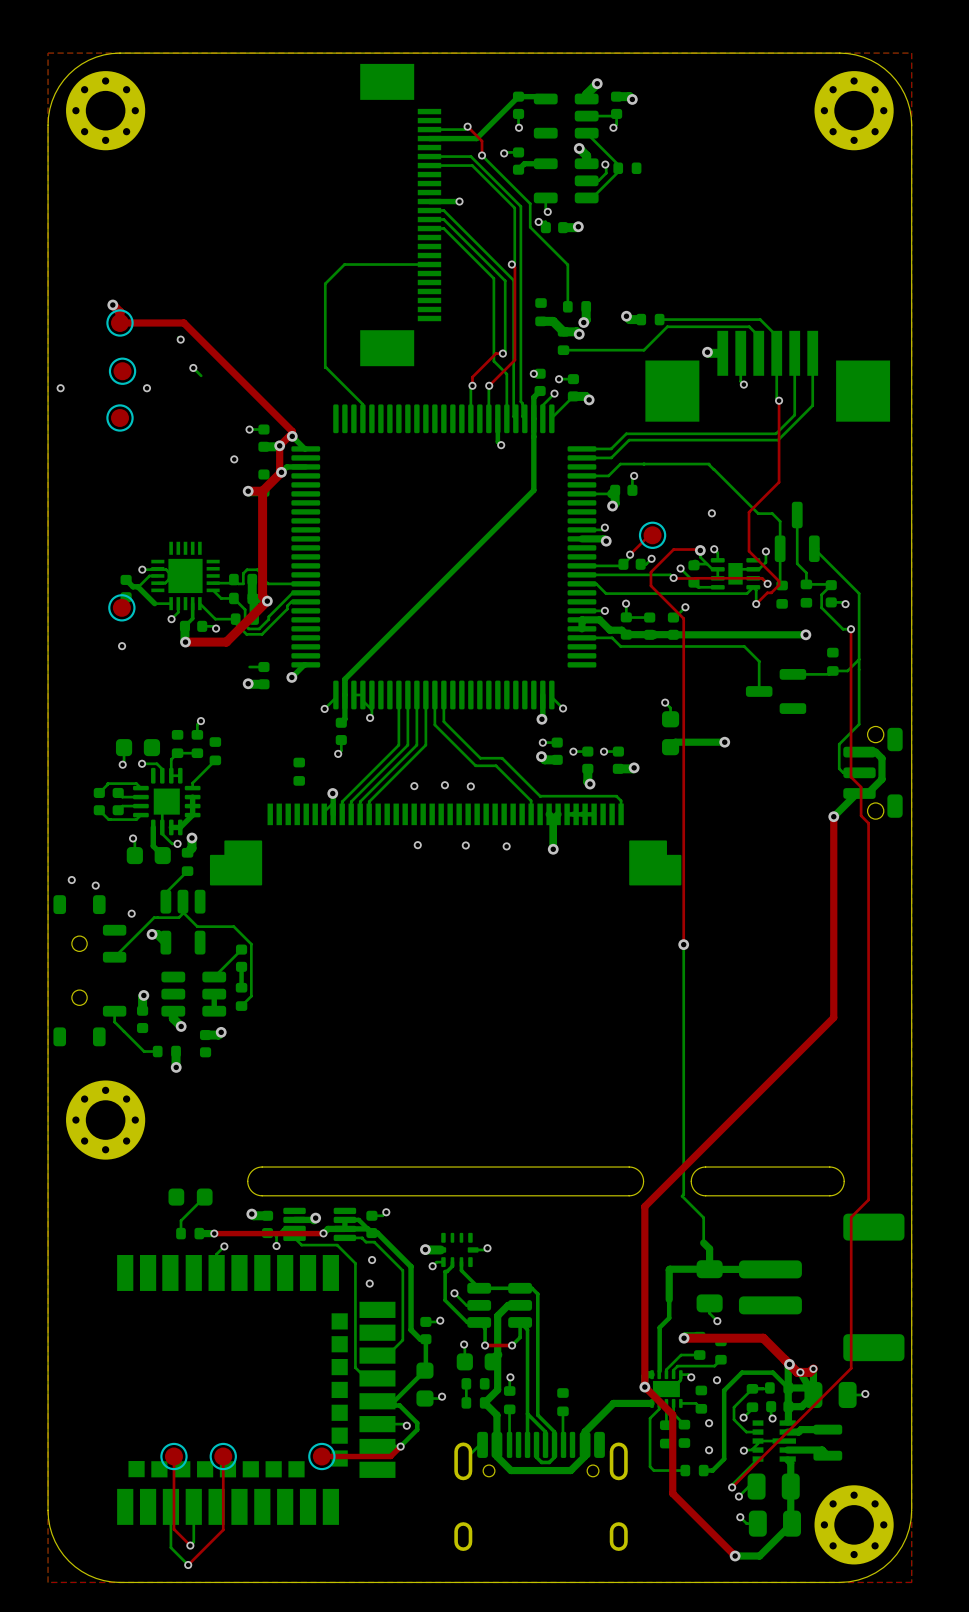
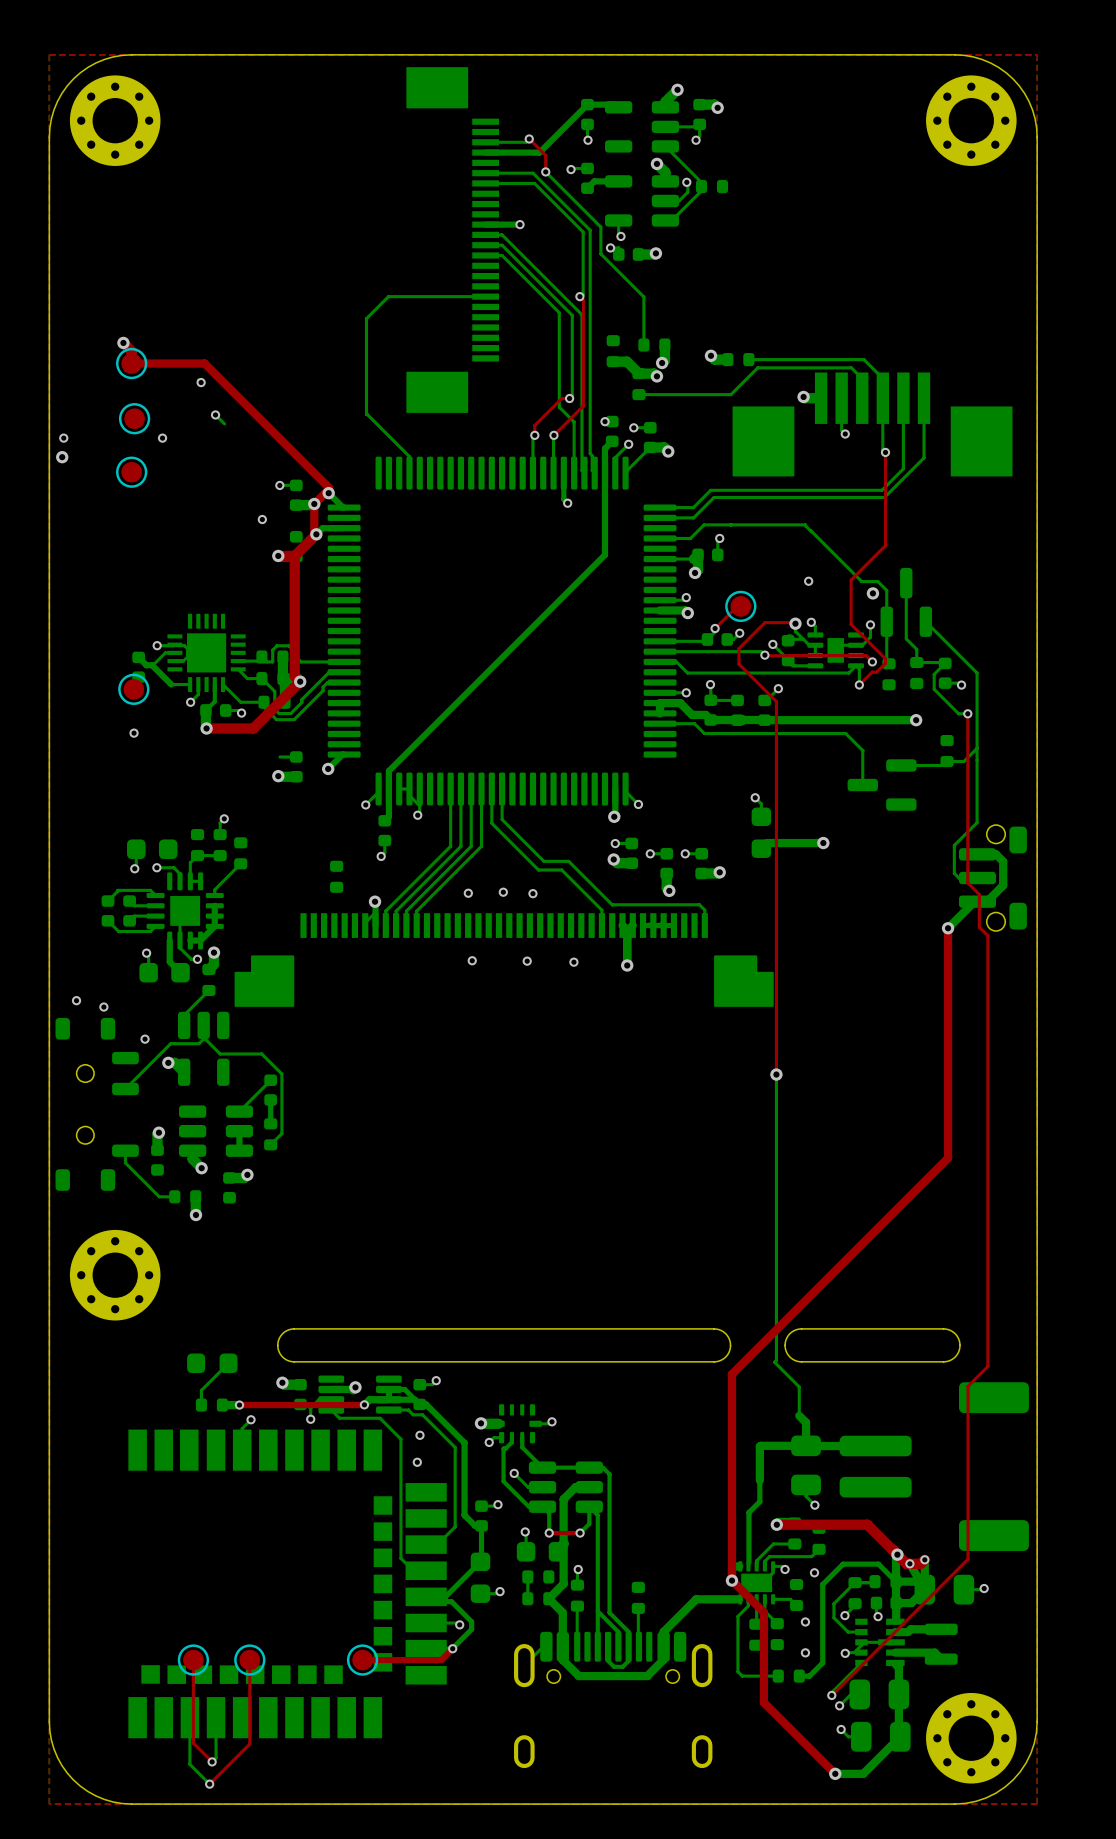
via: none -> (62, 457)
via: none -> (872, 593)

